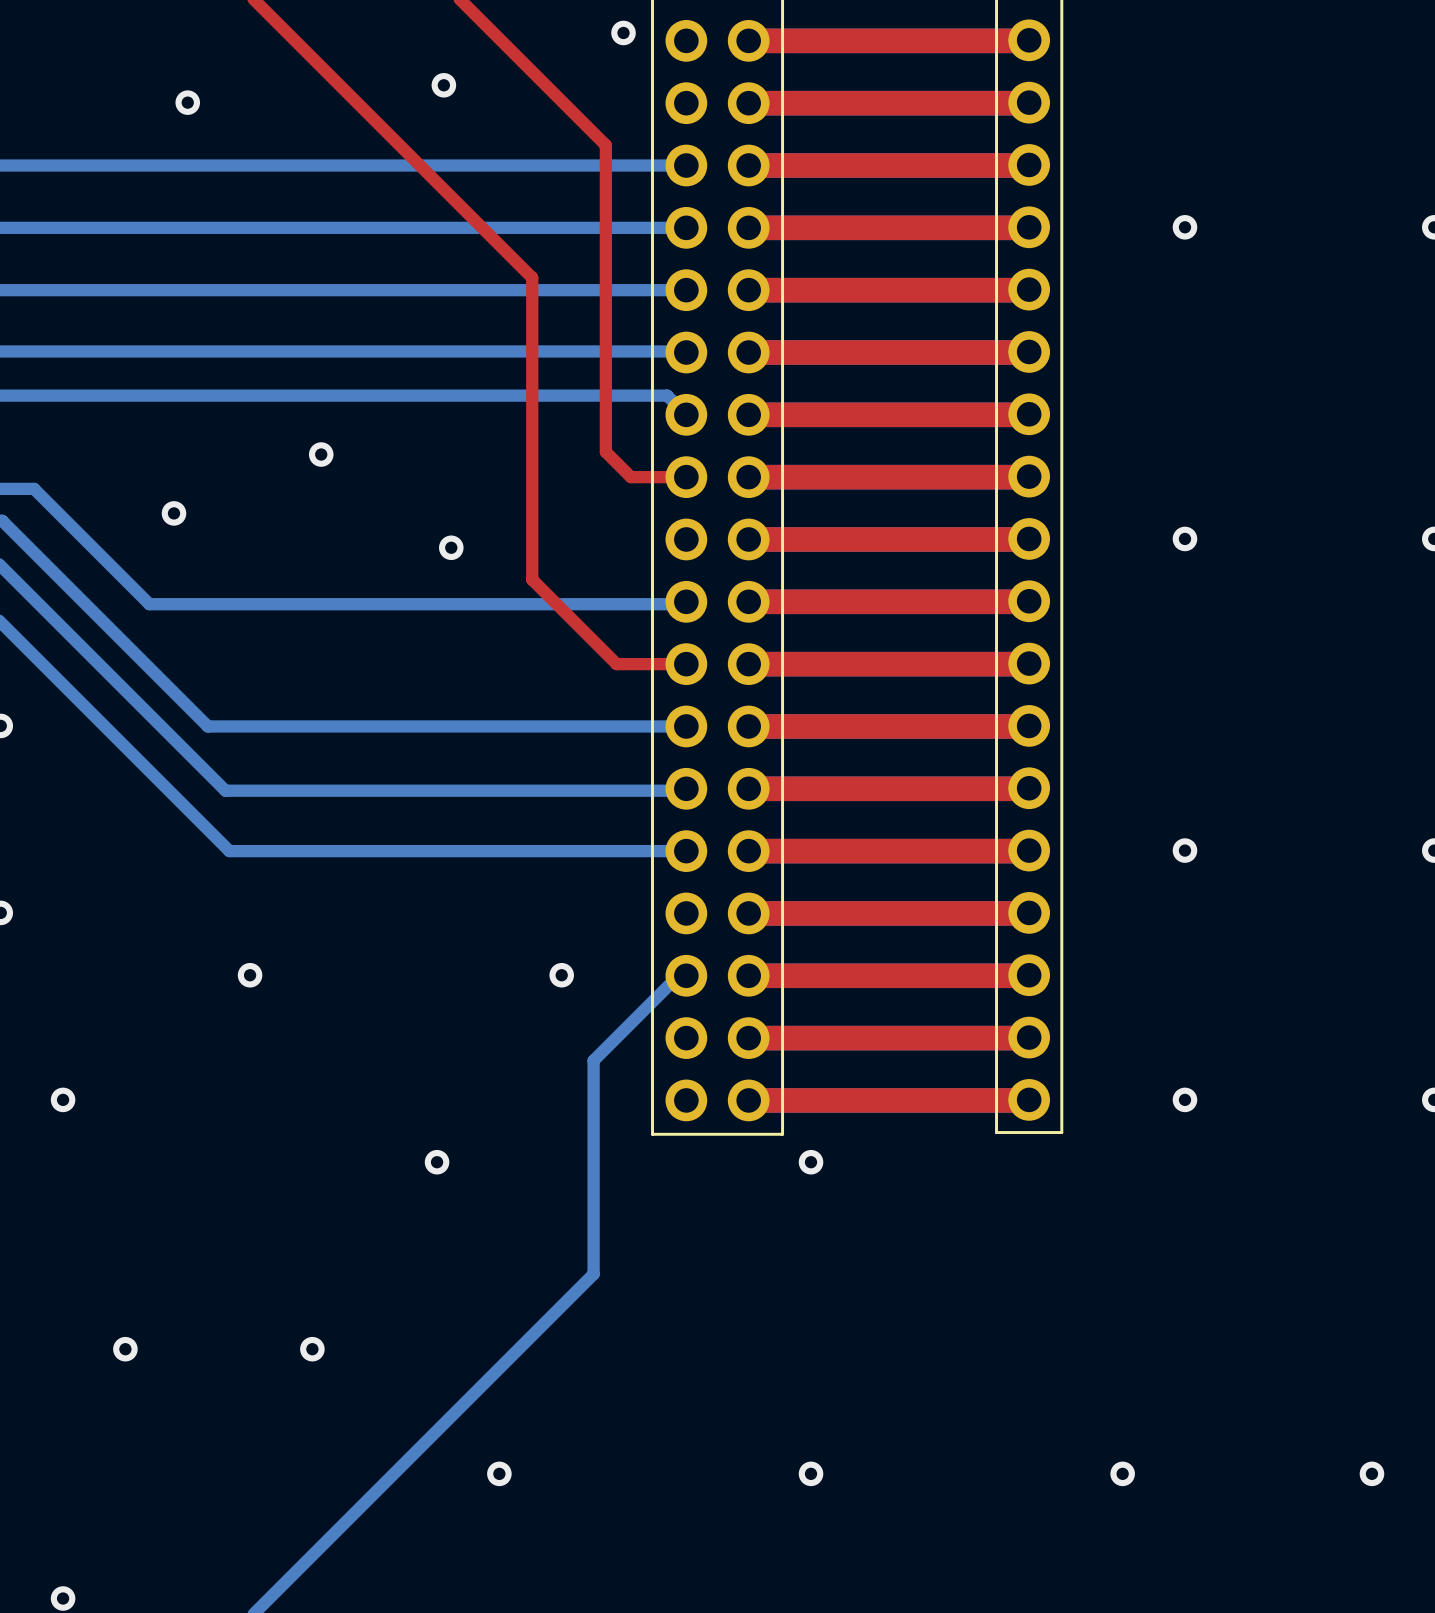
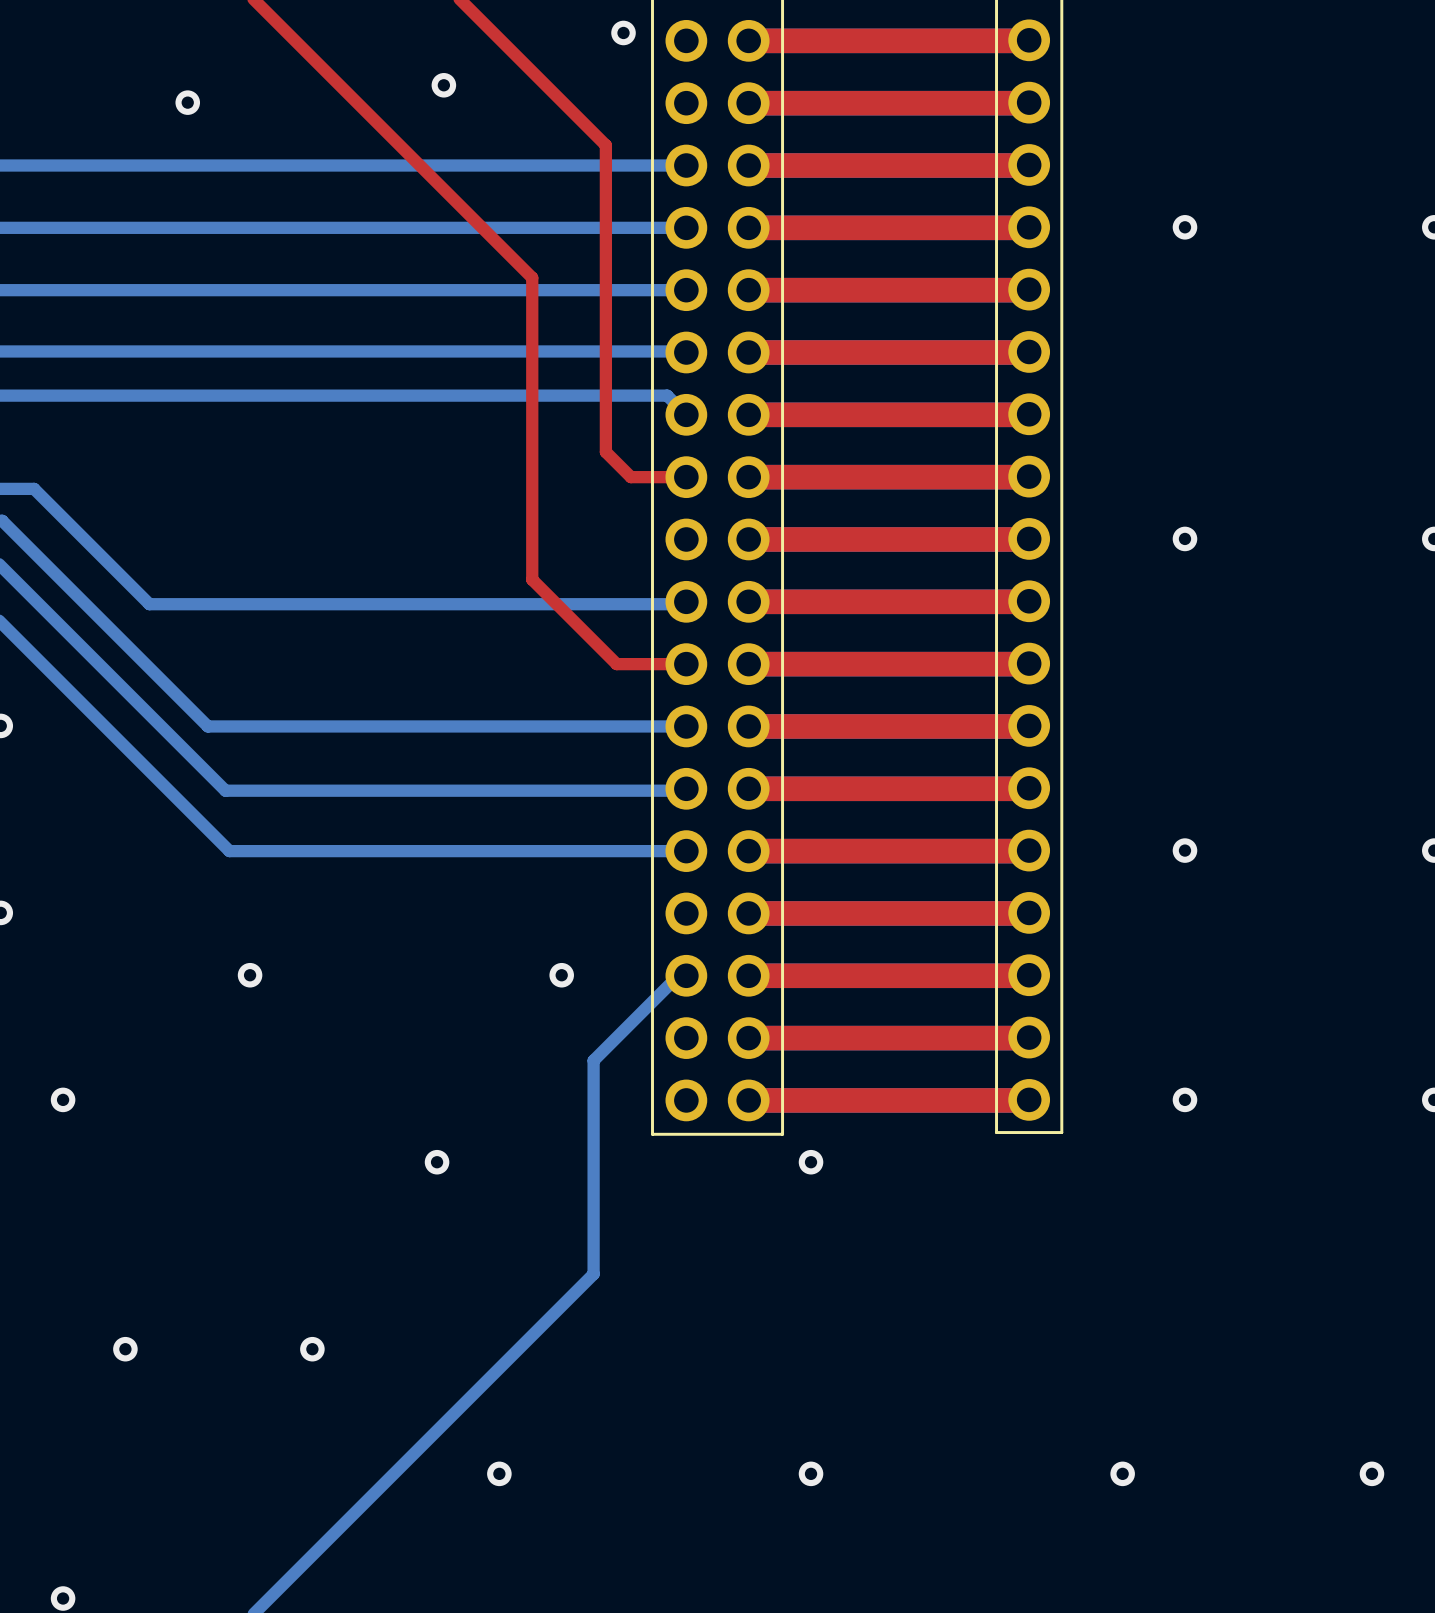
via: (321, 454) -> none
via: (173, 513) -> none
via: (451, 547) -> none

